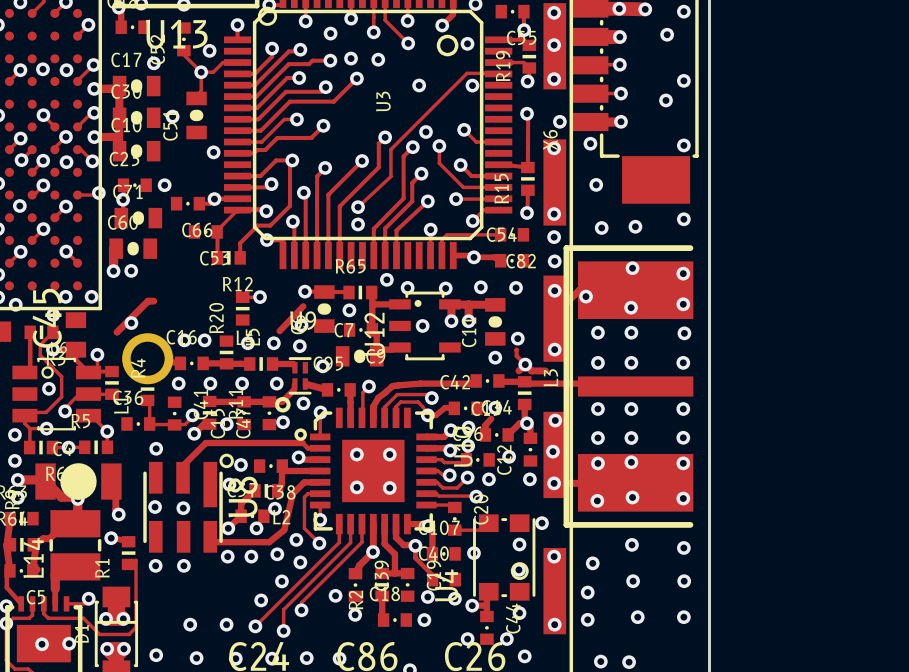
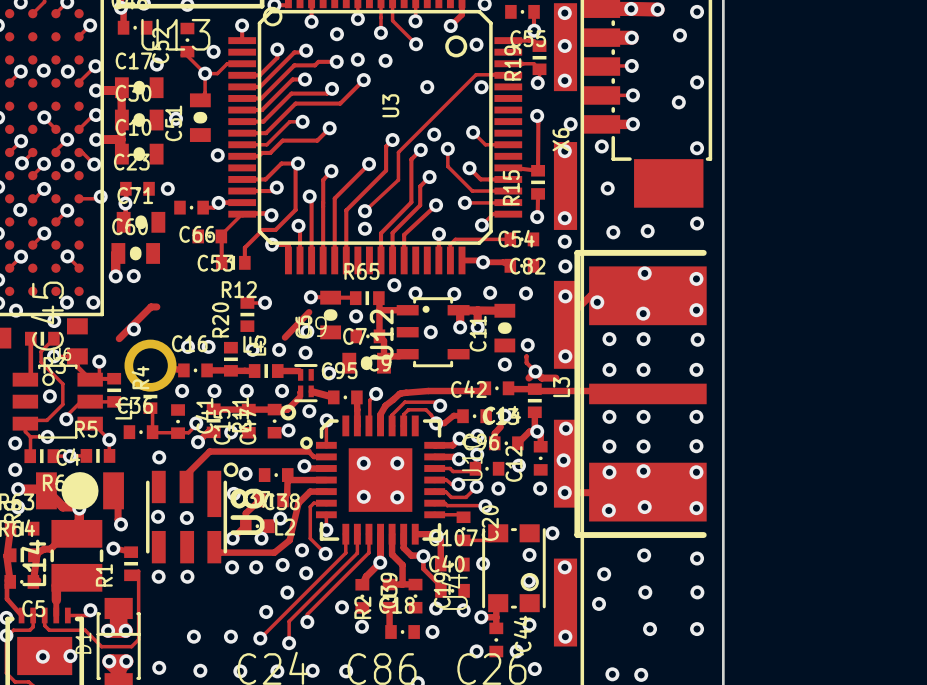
via: (587, 619) -> none

